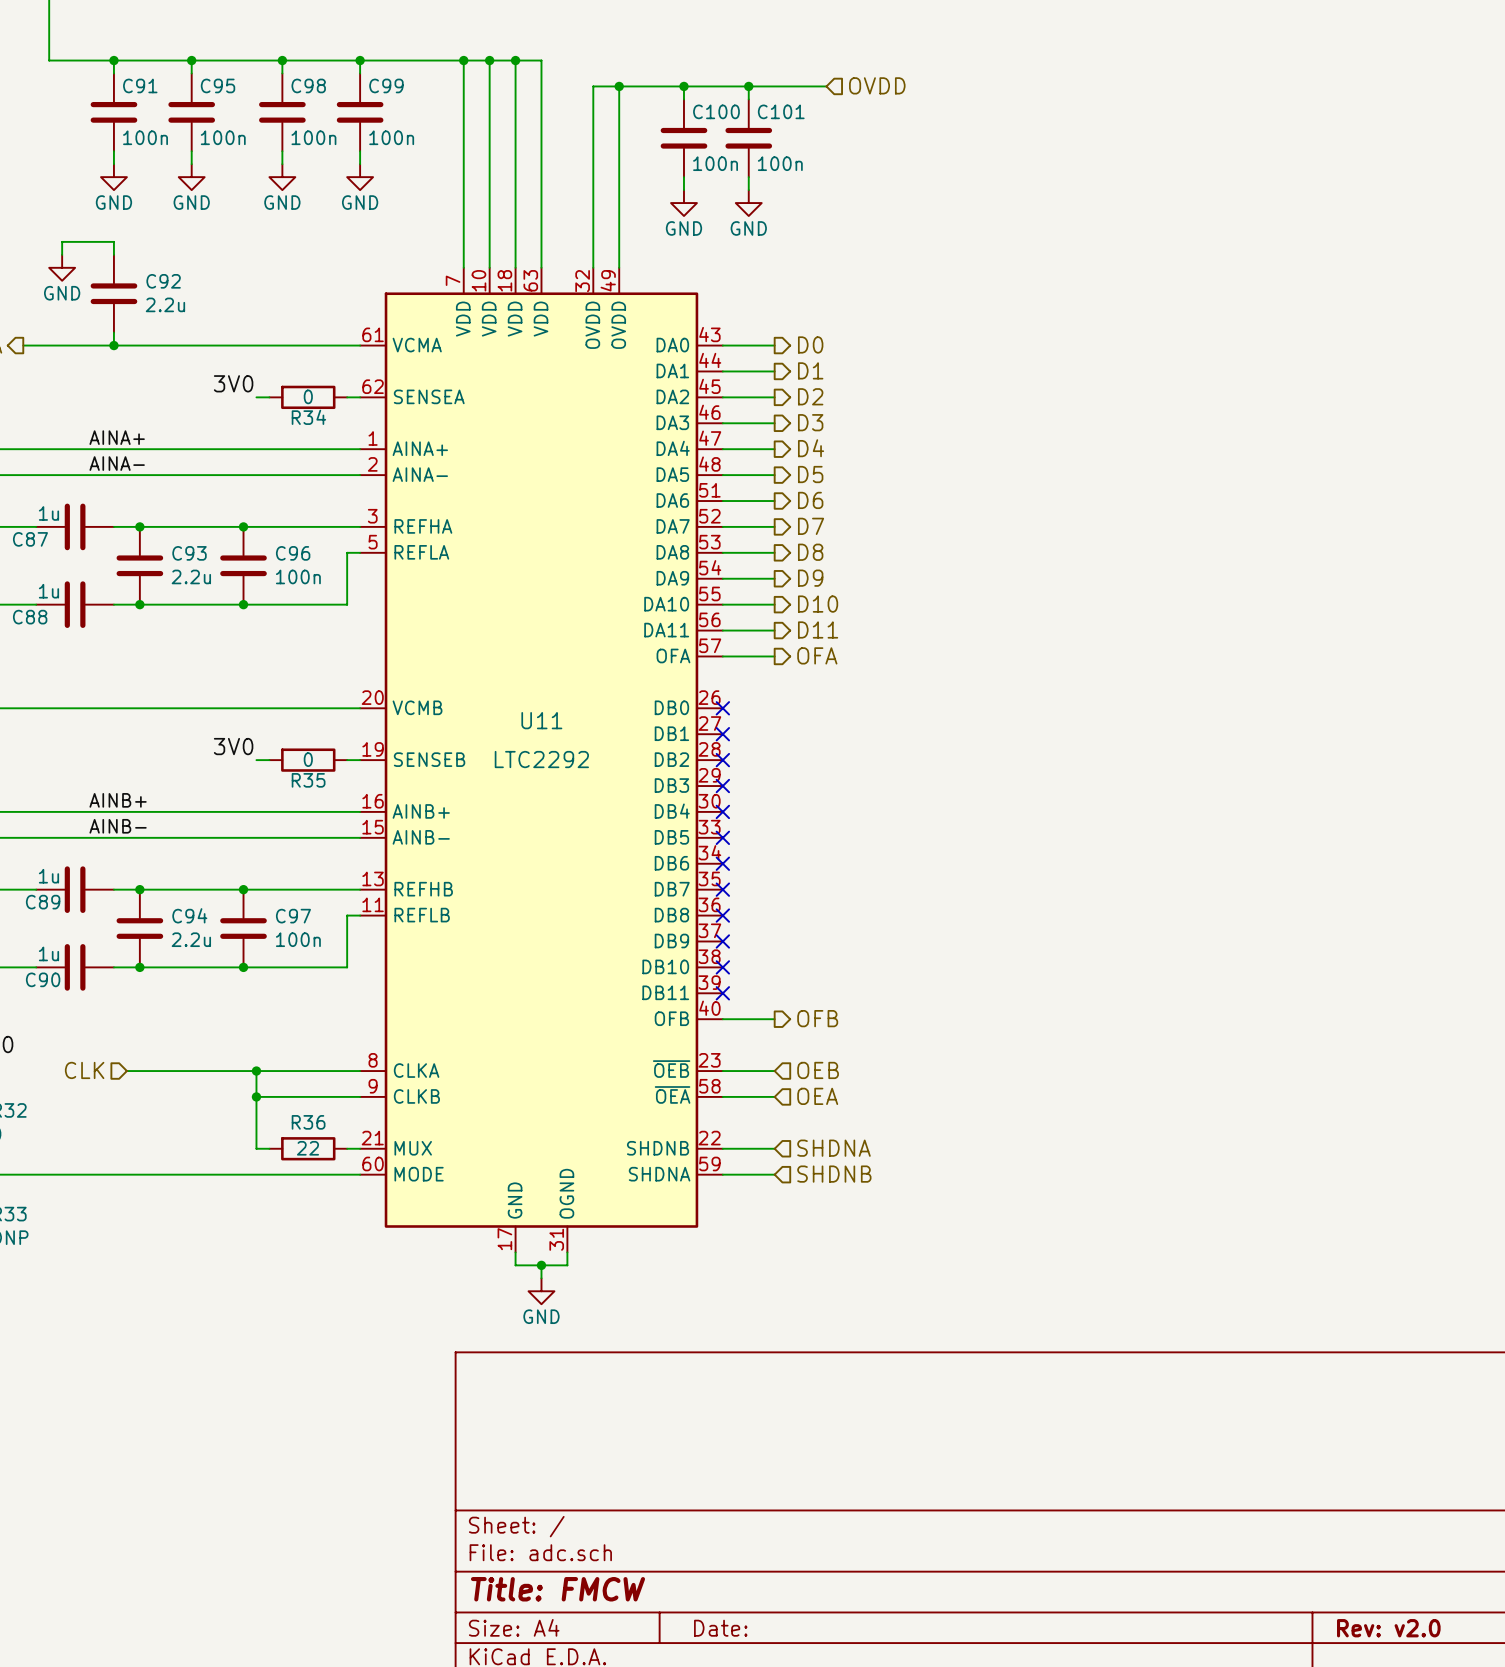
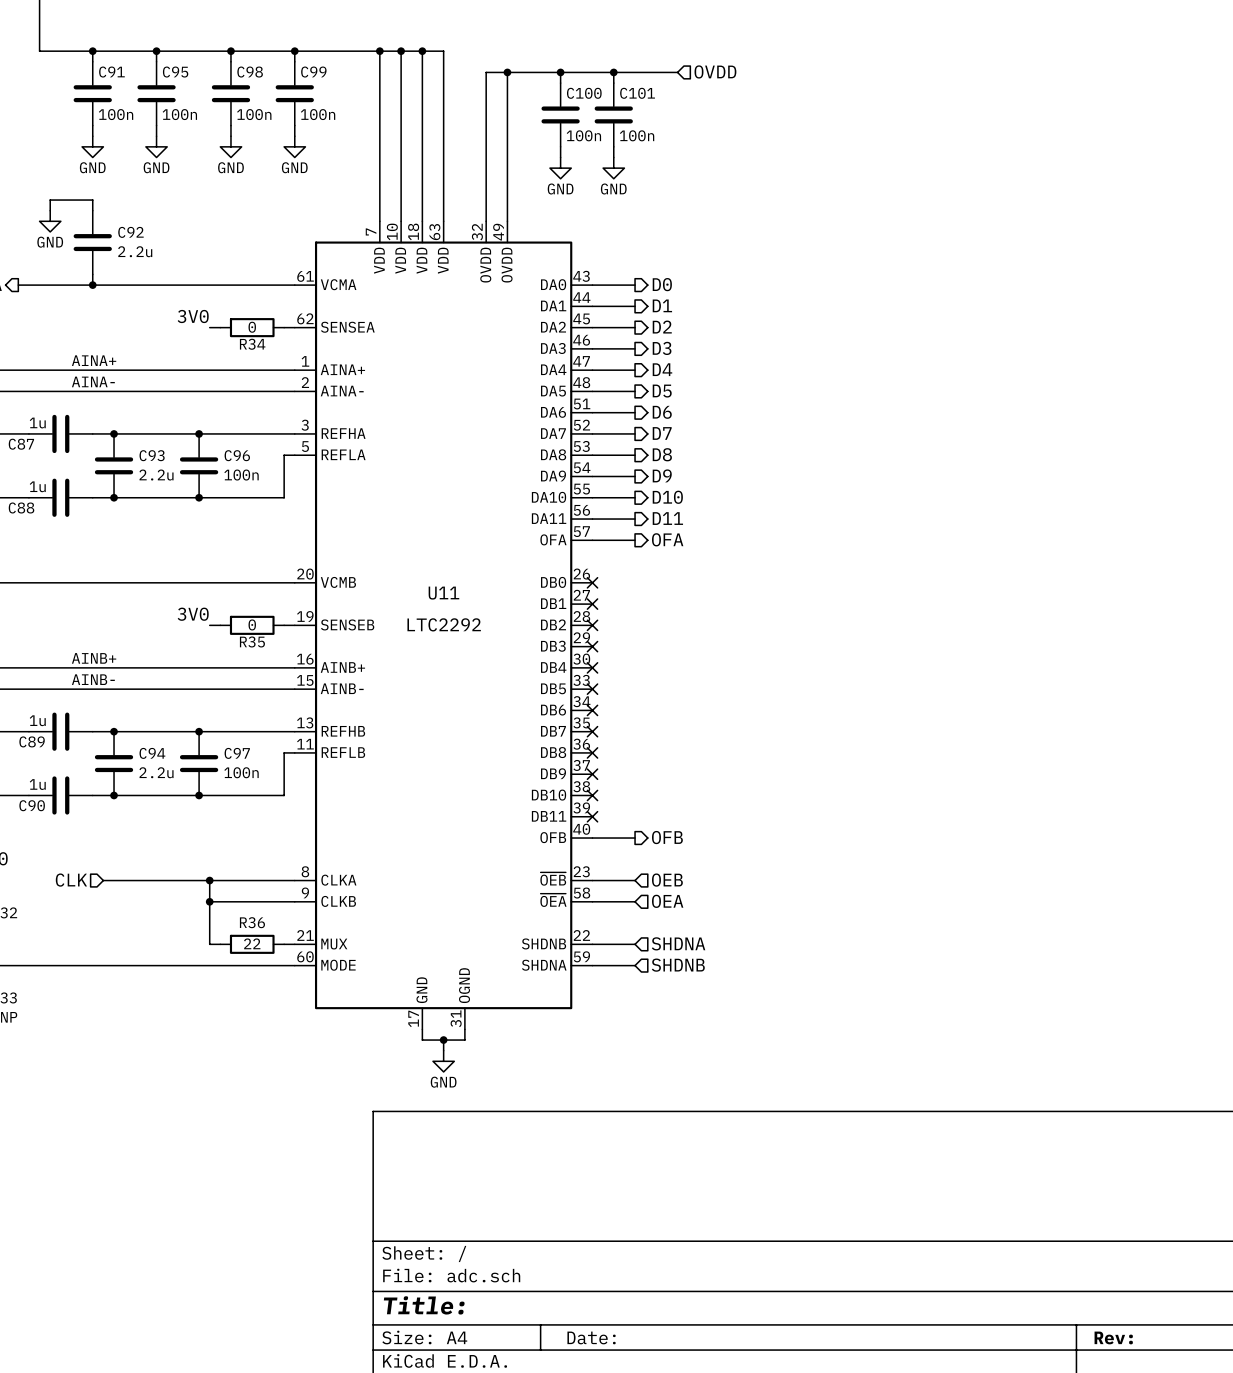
title block: Title: FMCW (557, 1589) -> Title: (424, 1305)
title block: Rev: v2.0 (1388, 1628) -> Rev: (1113, 1337)

